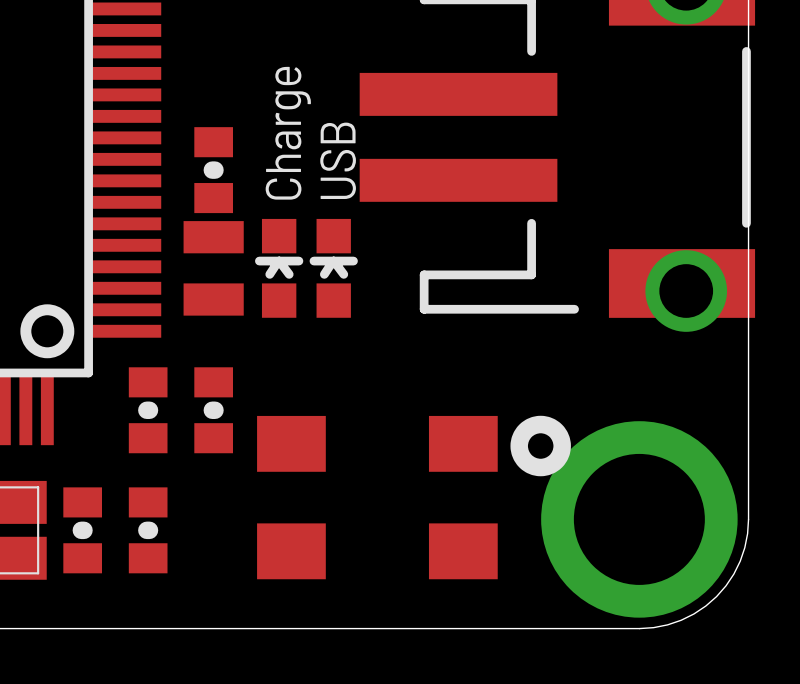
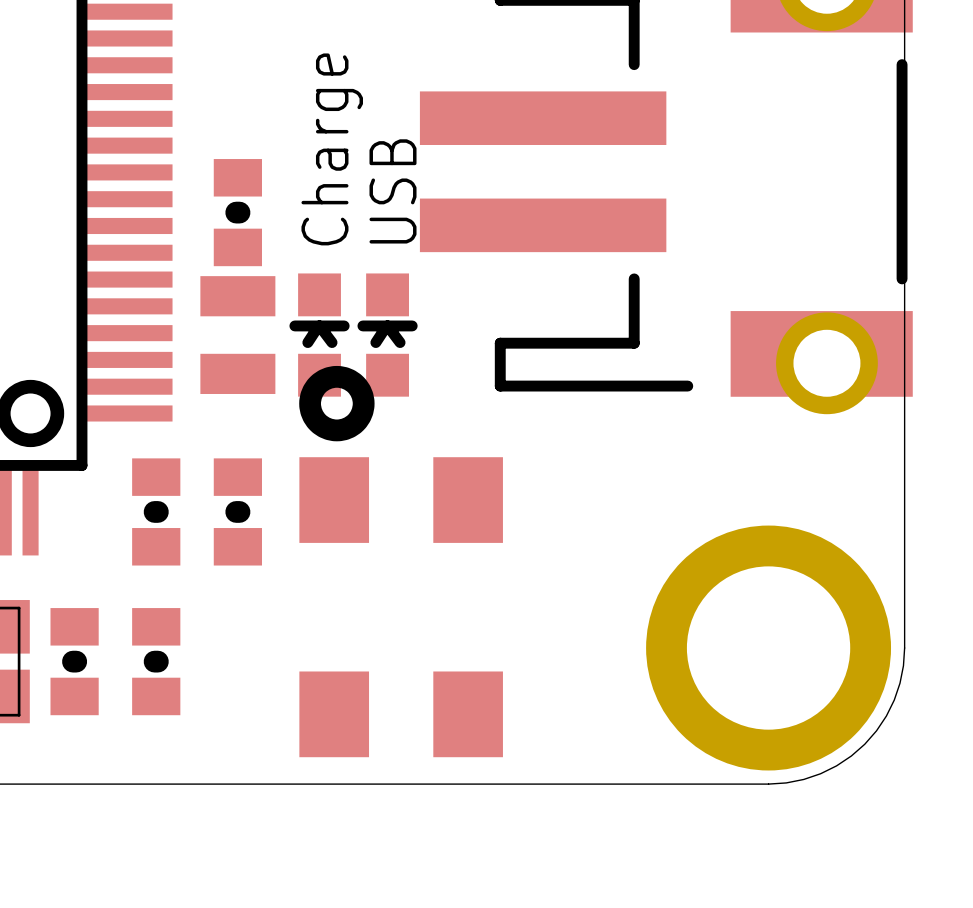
part rotation: 0° (413, 497) -> 90° counterclockwise (401, 561)

